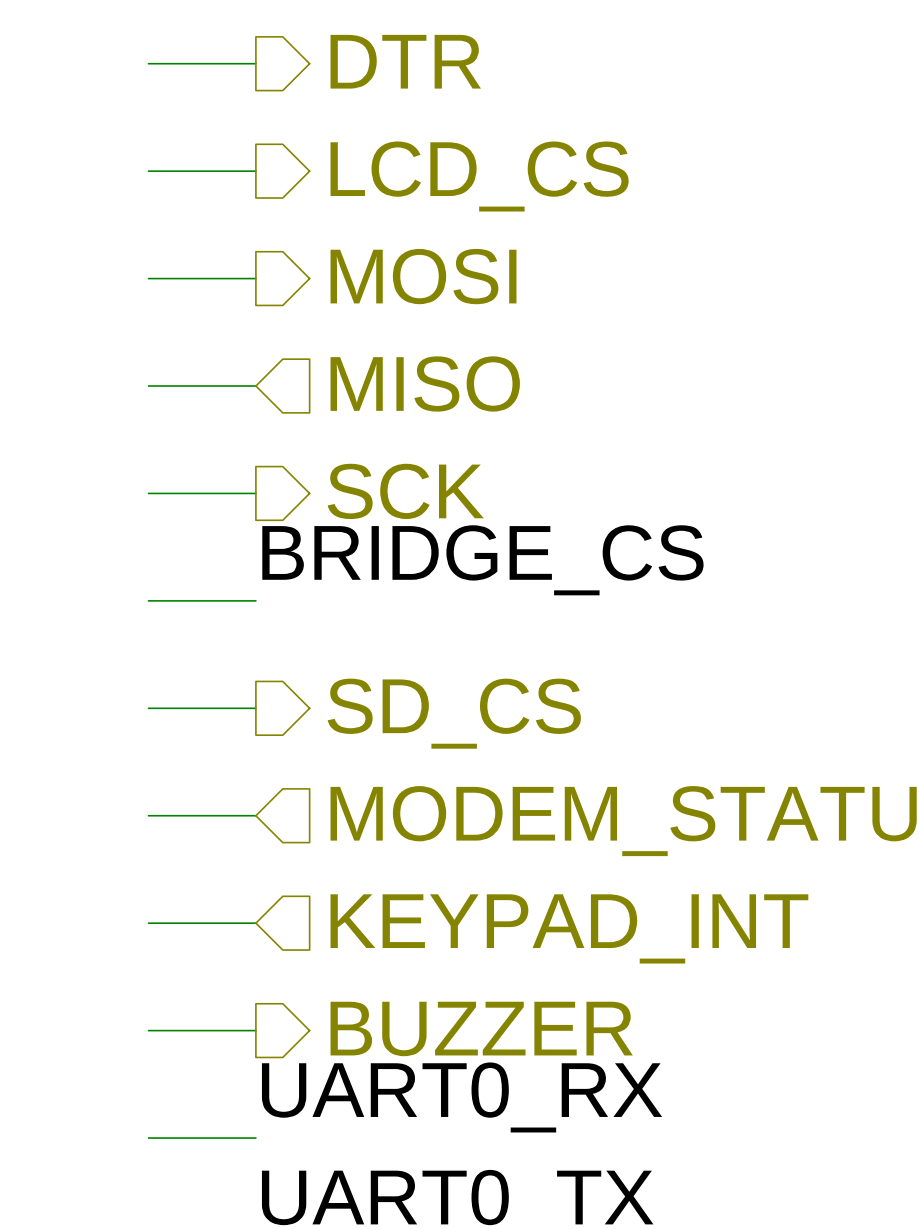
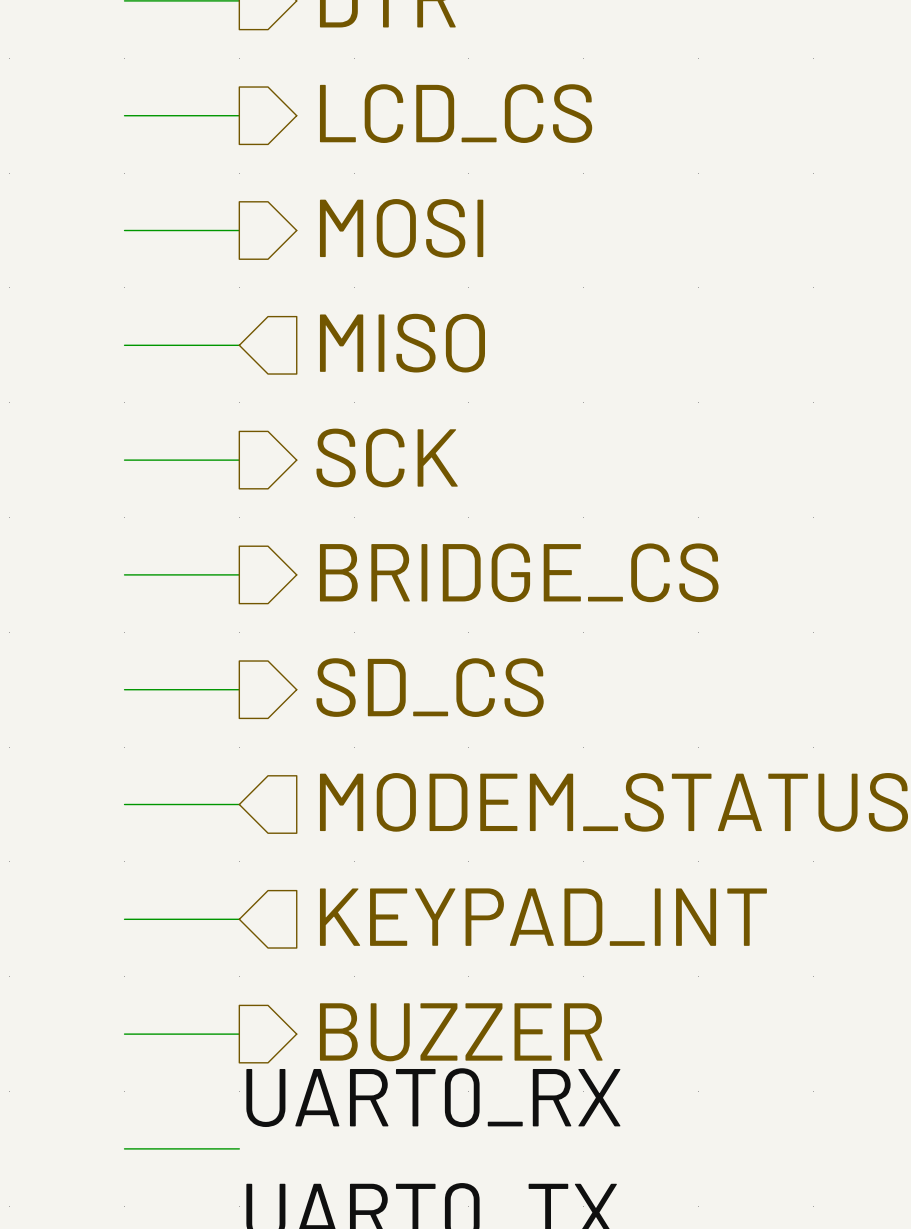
label: BRIDGE_CS (482, 560) -> none
hierarchical label: none -> BRIDGE_CS (519, 572)

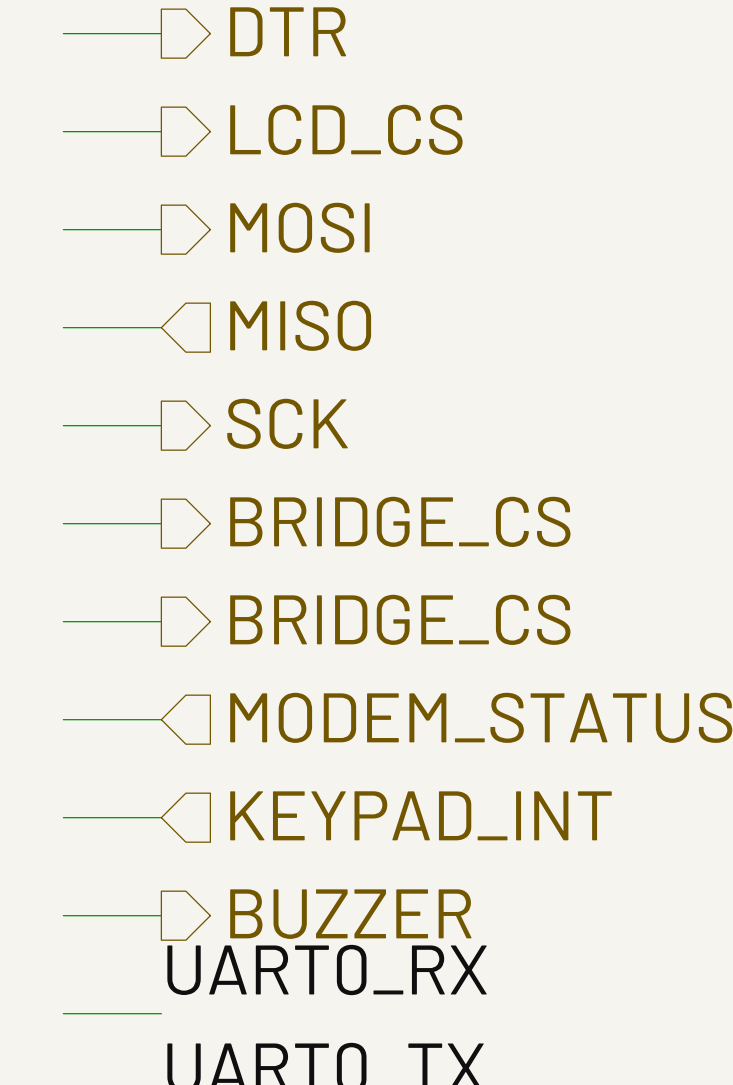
hierarchical label: SD_CS (430, 687) -> BRIDGE_CS (400, 619)

